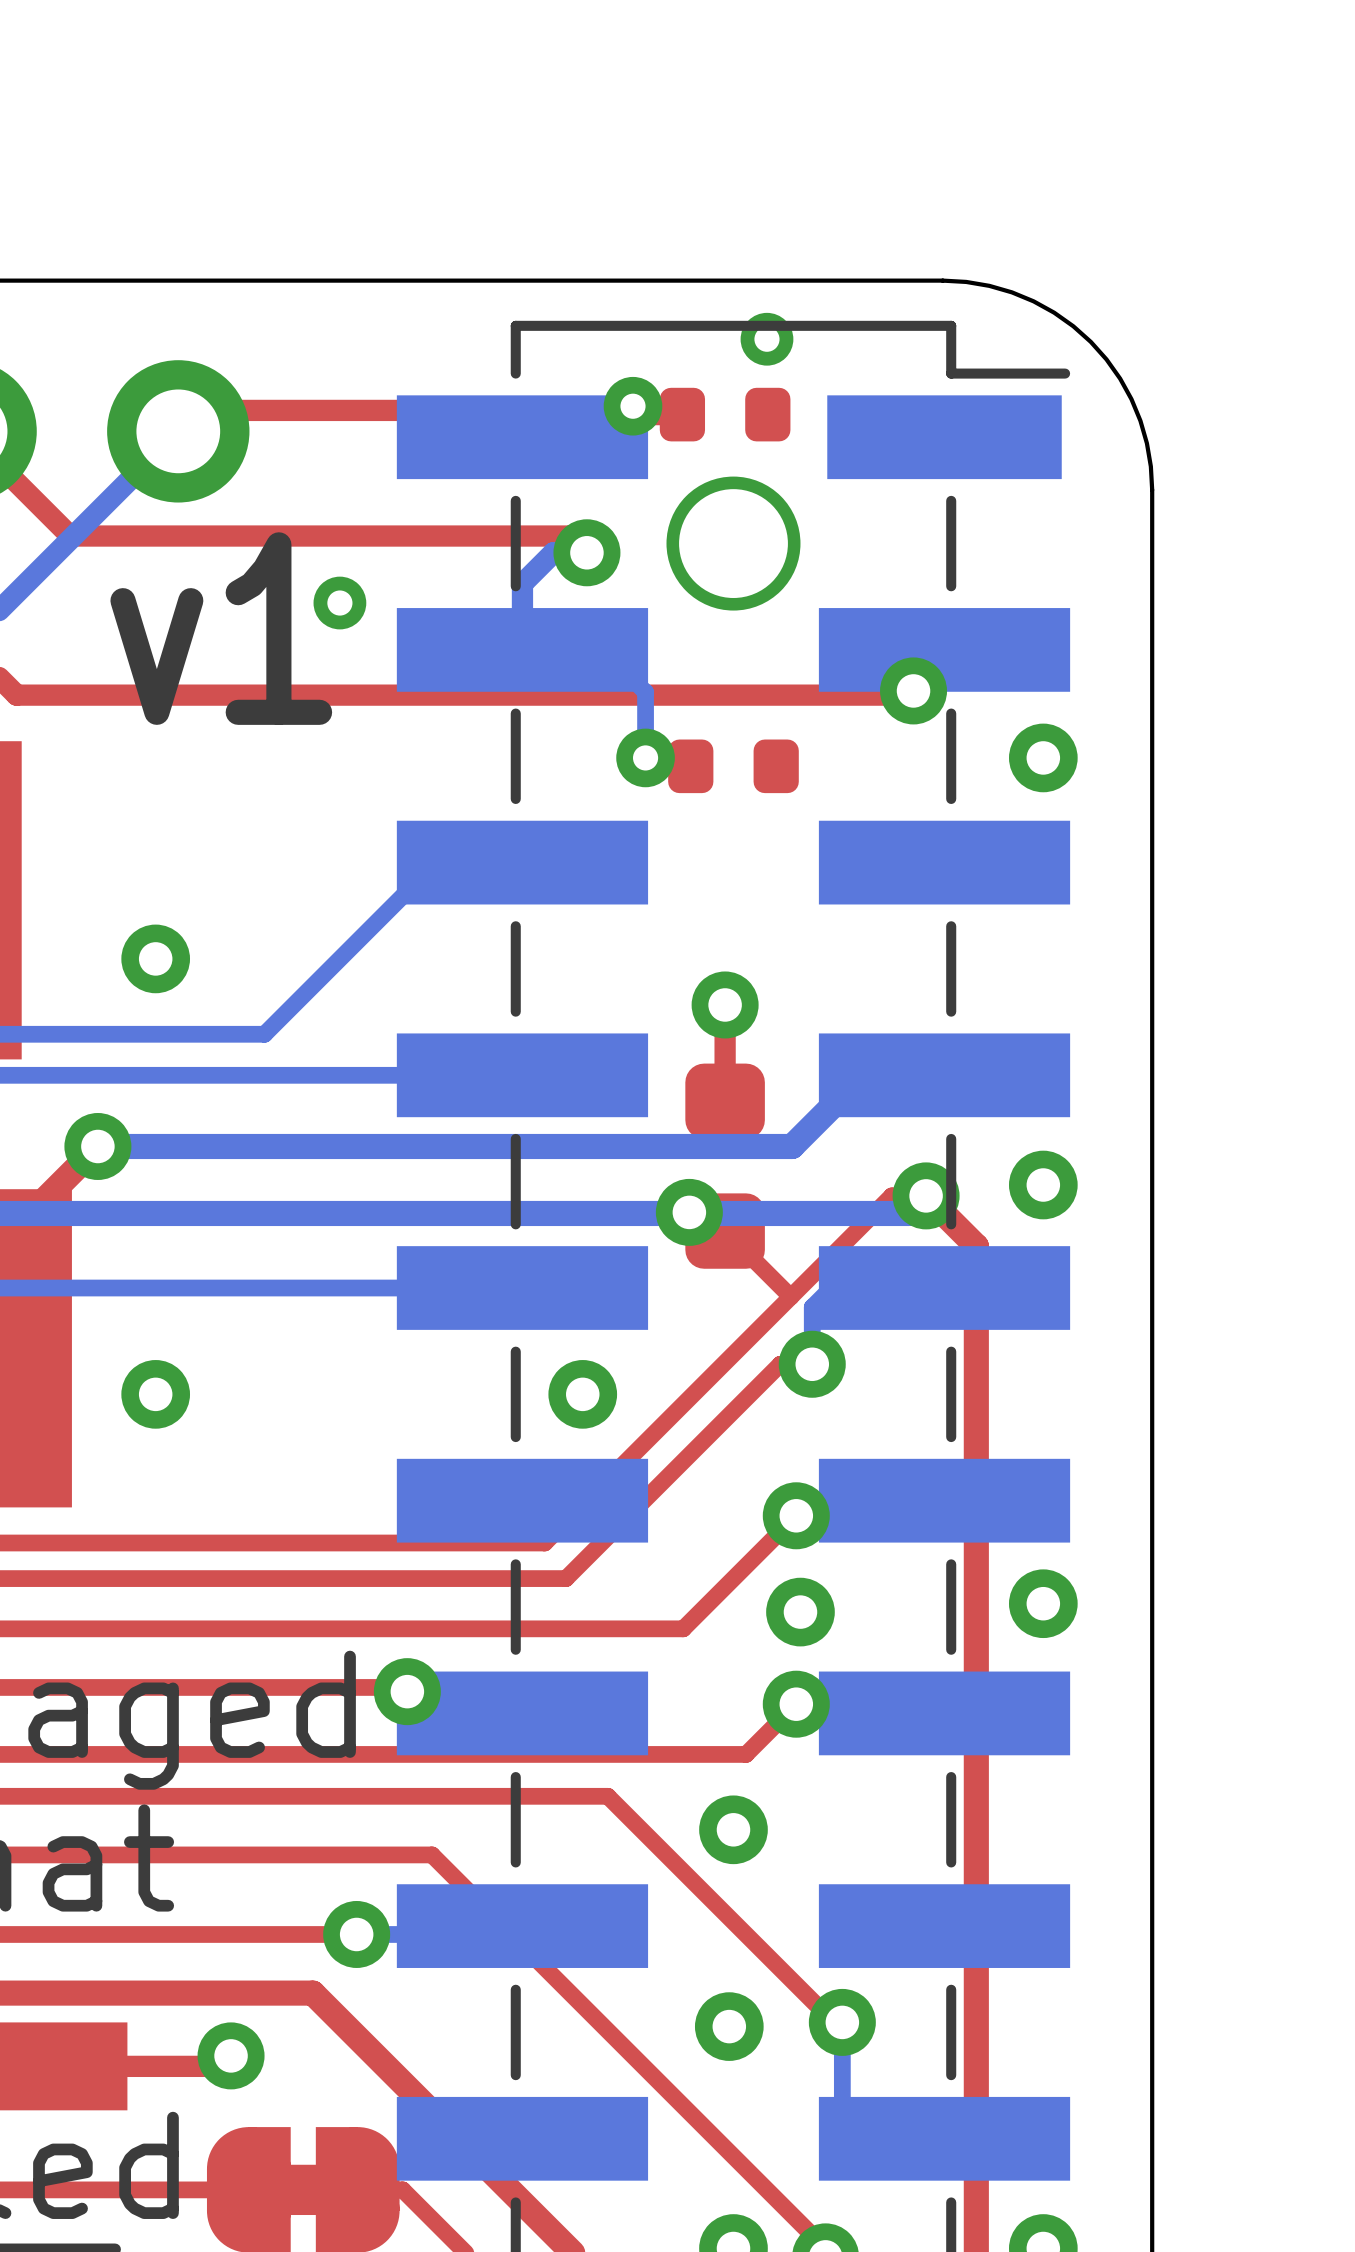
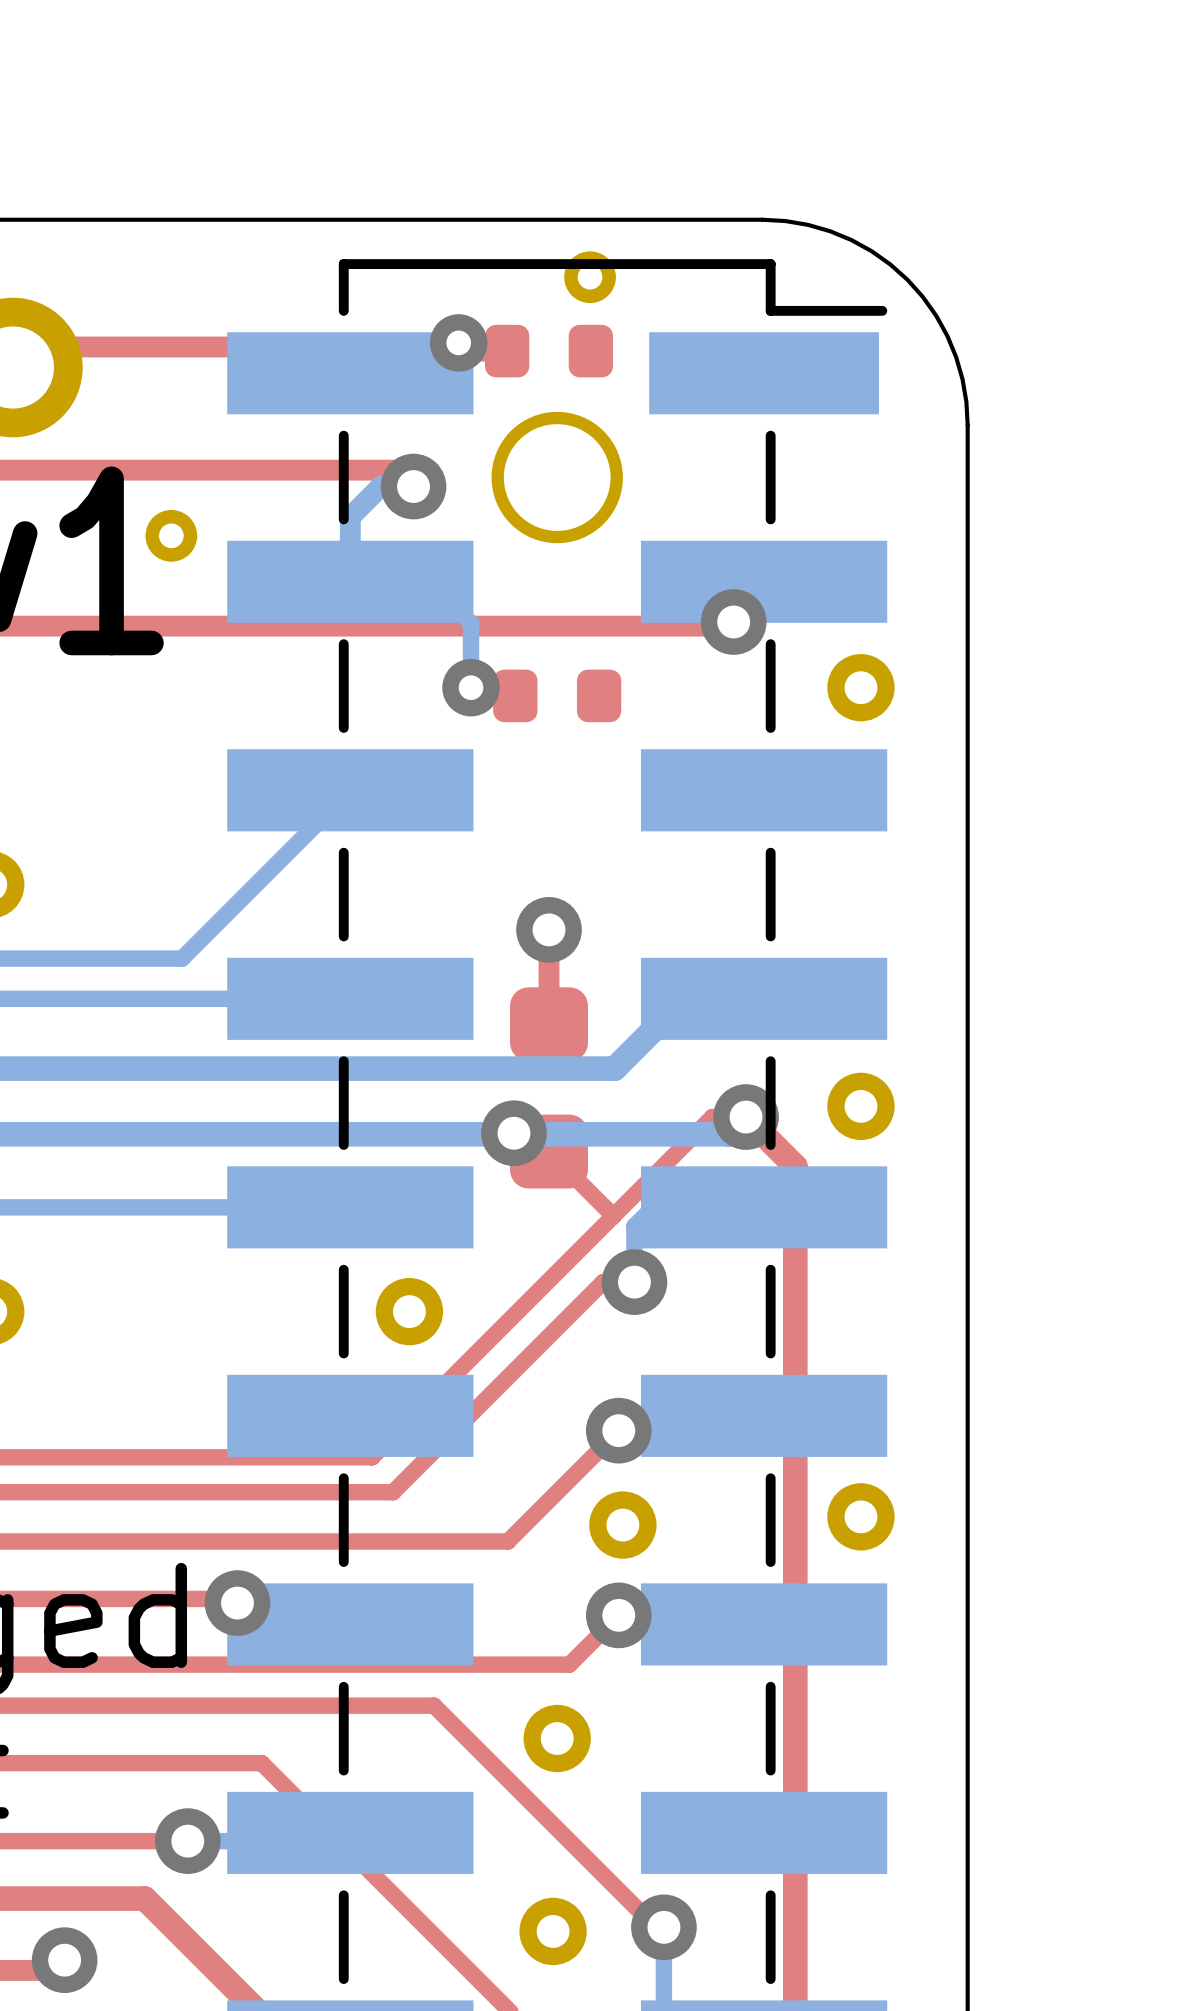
bottom track: (522, 862) (436, 862) (264, 1034) -> (350, 790) (182, 958) (97, 958)

